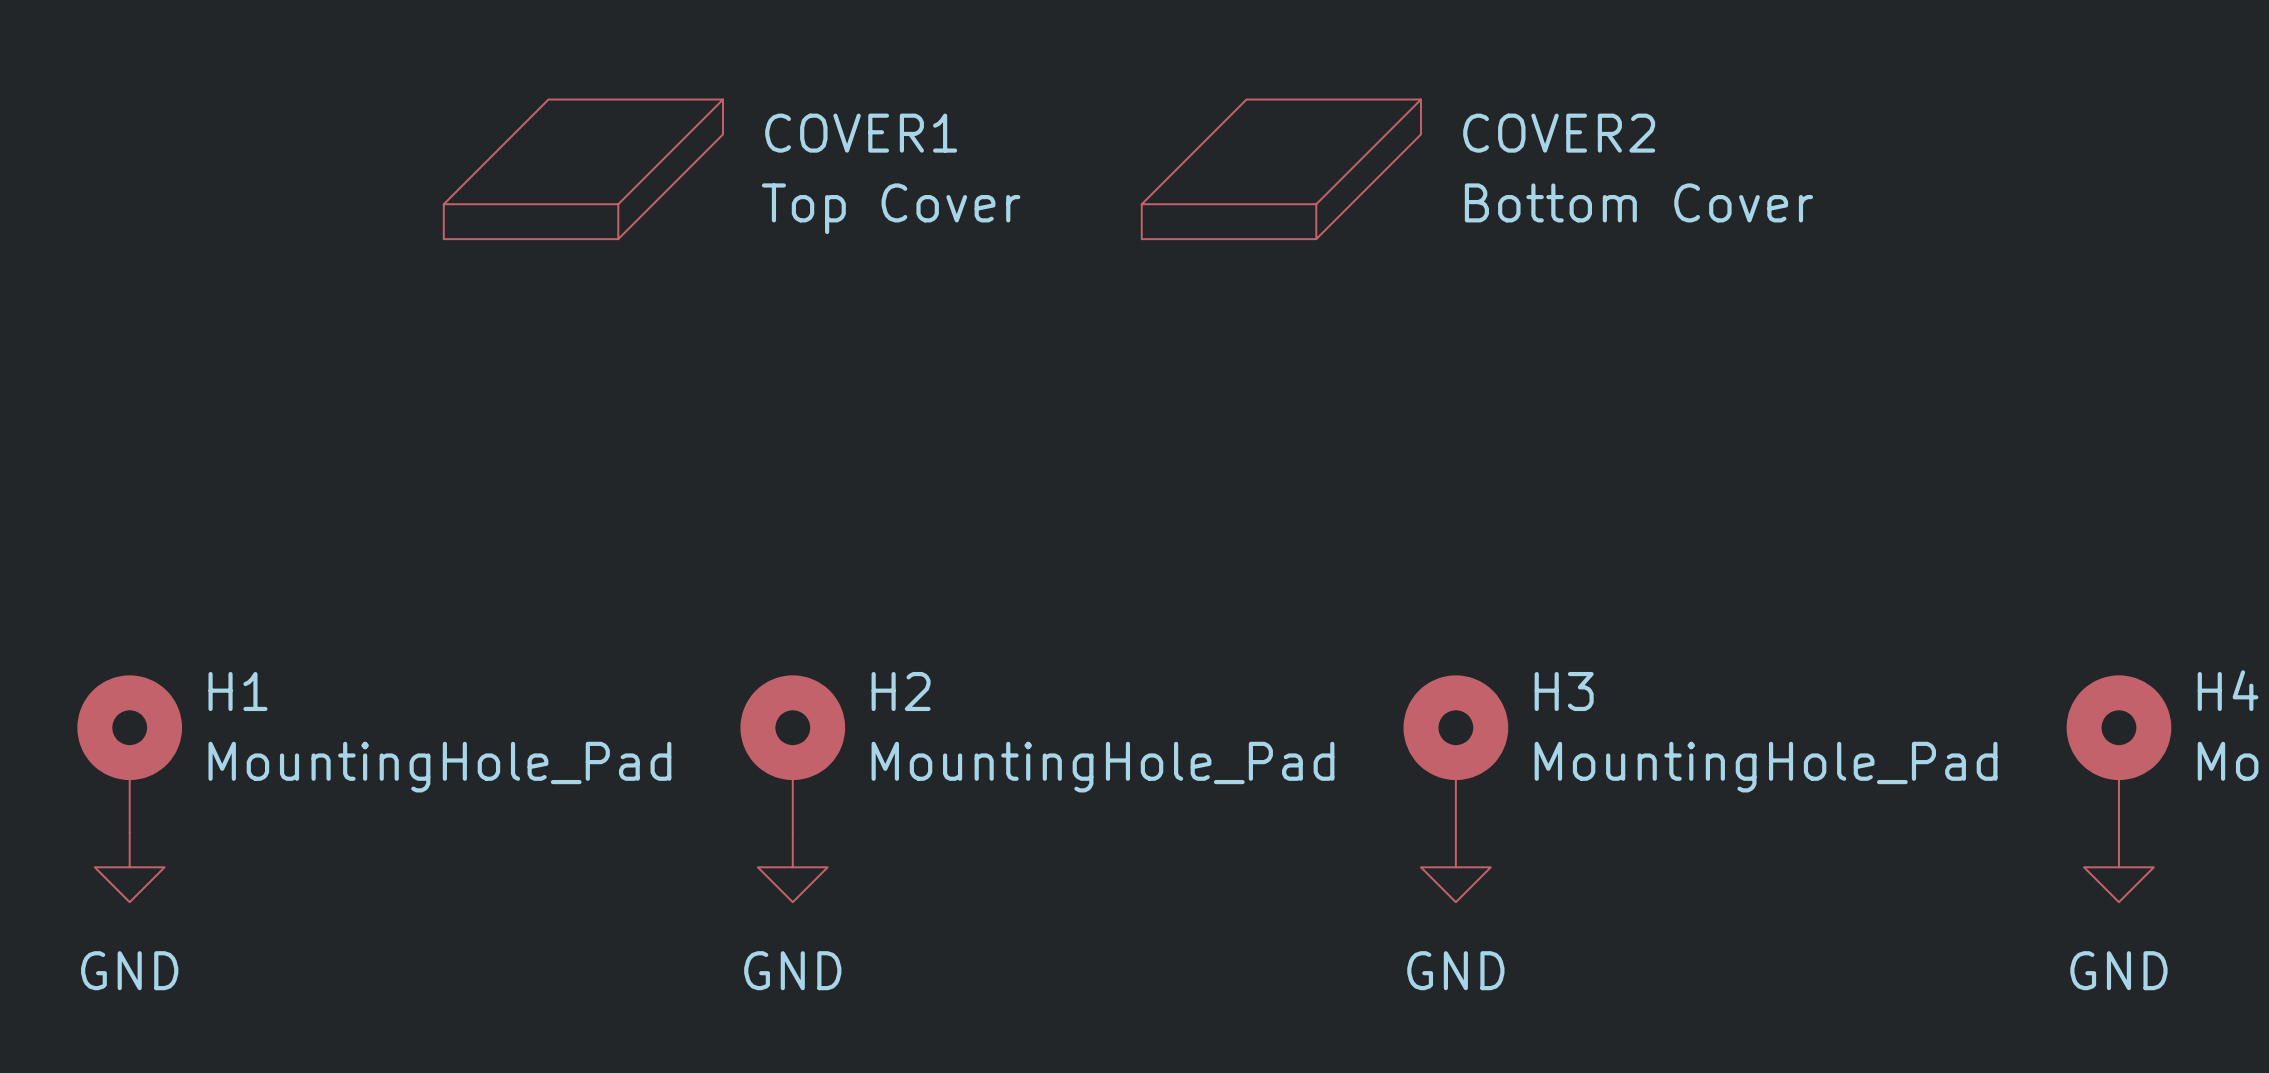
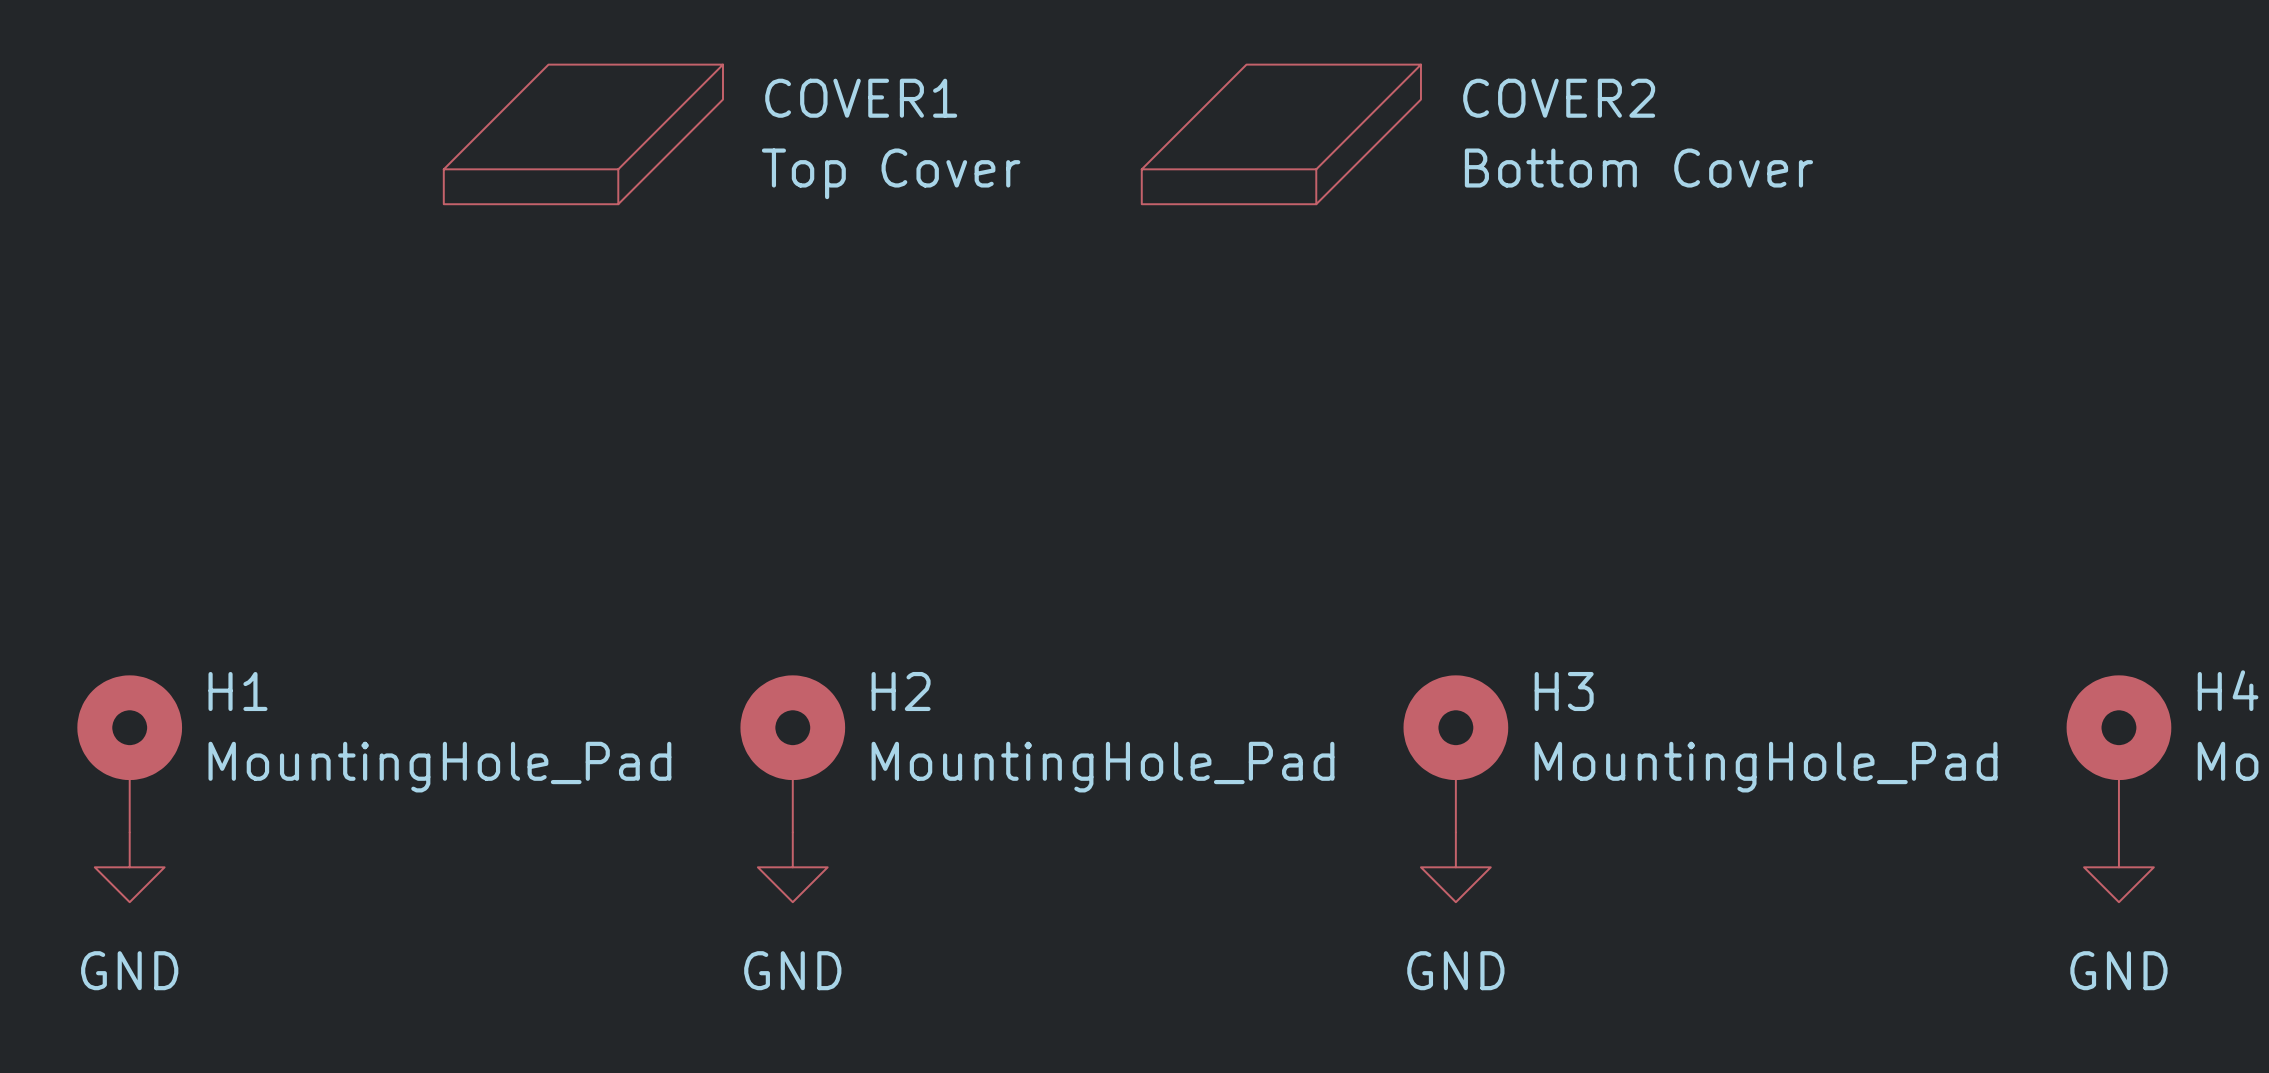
COVER1 position: (583, 169) -> (583, 134)
COVER2 position: (1281, 169) -> (1281, 134)

